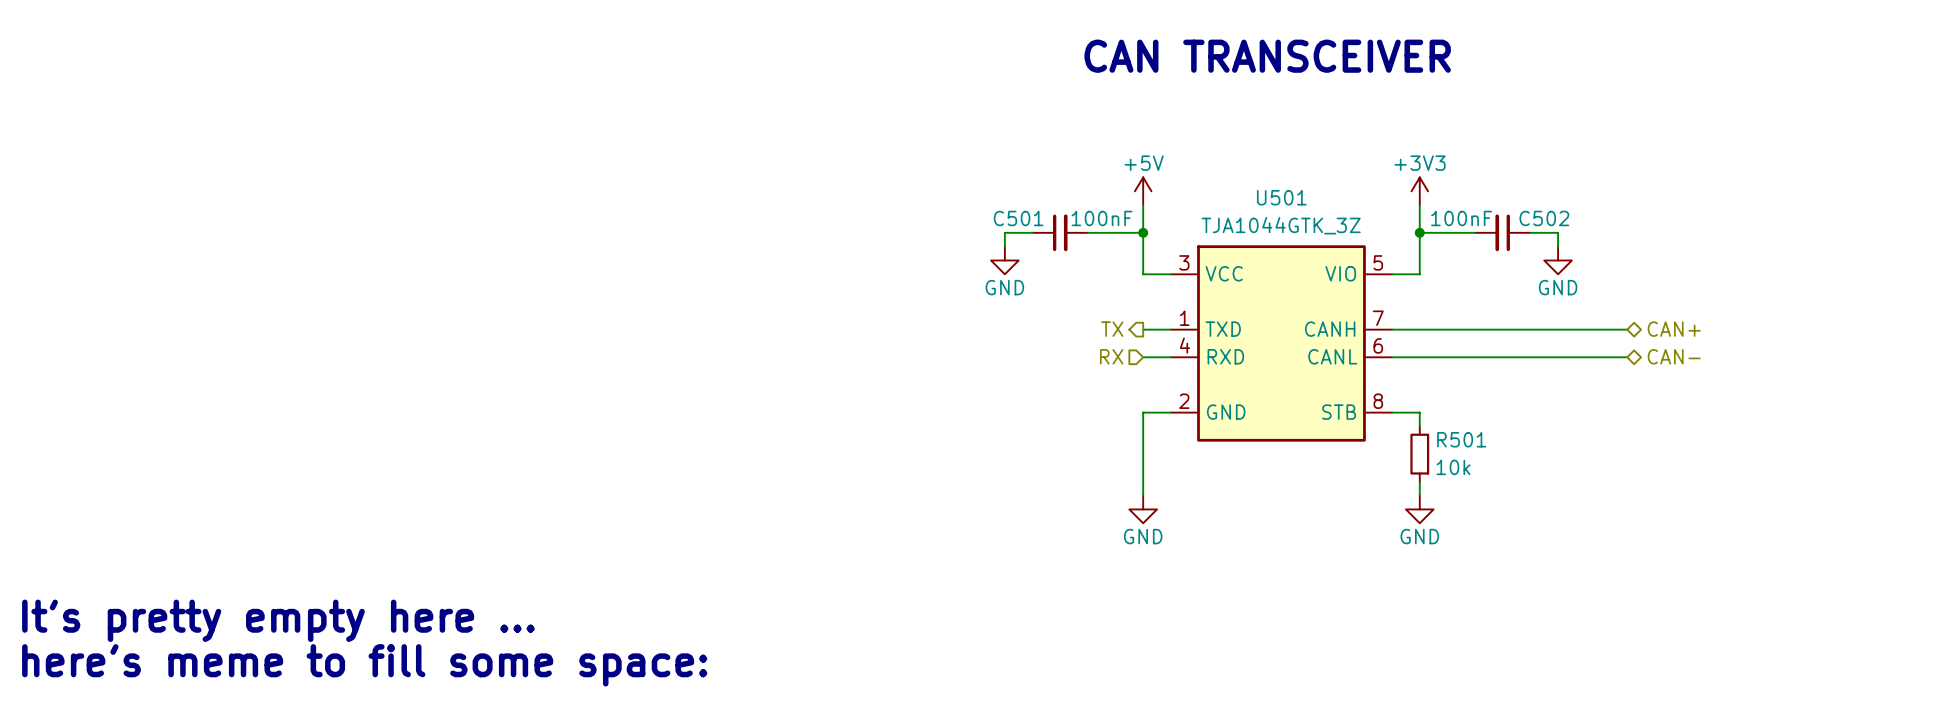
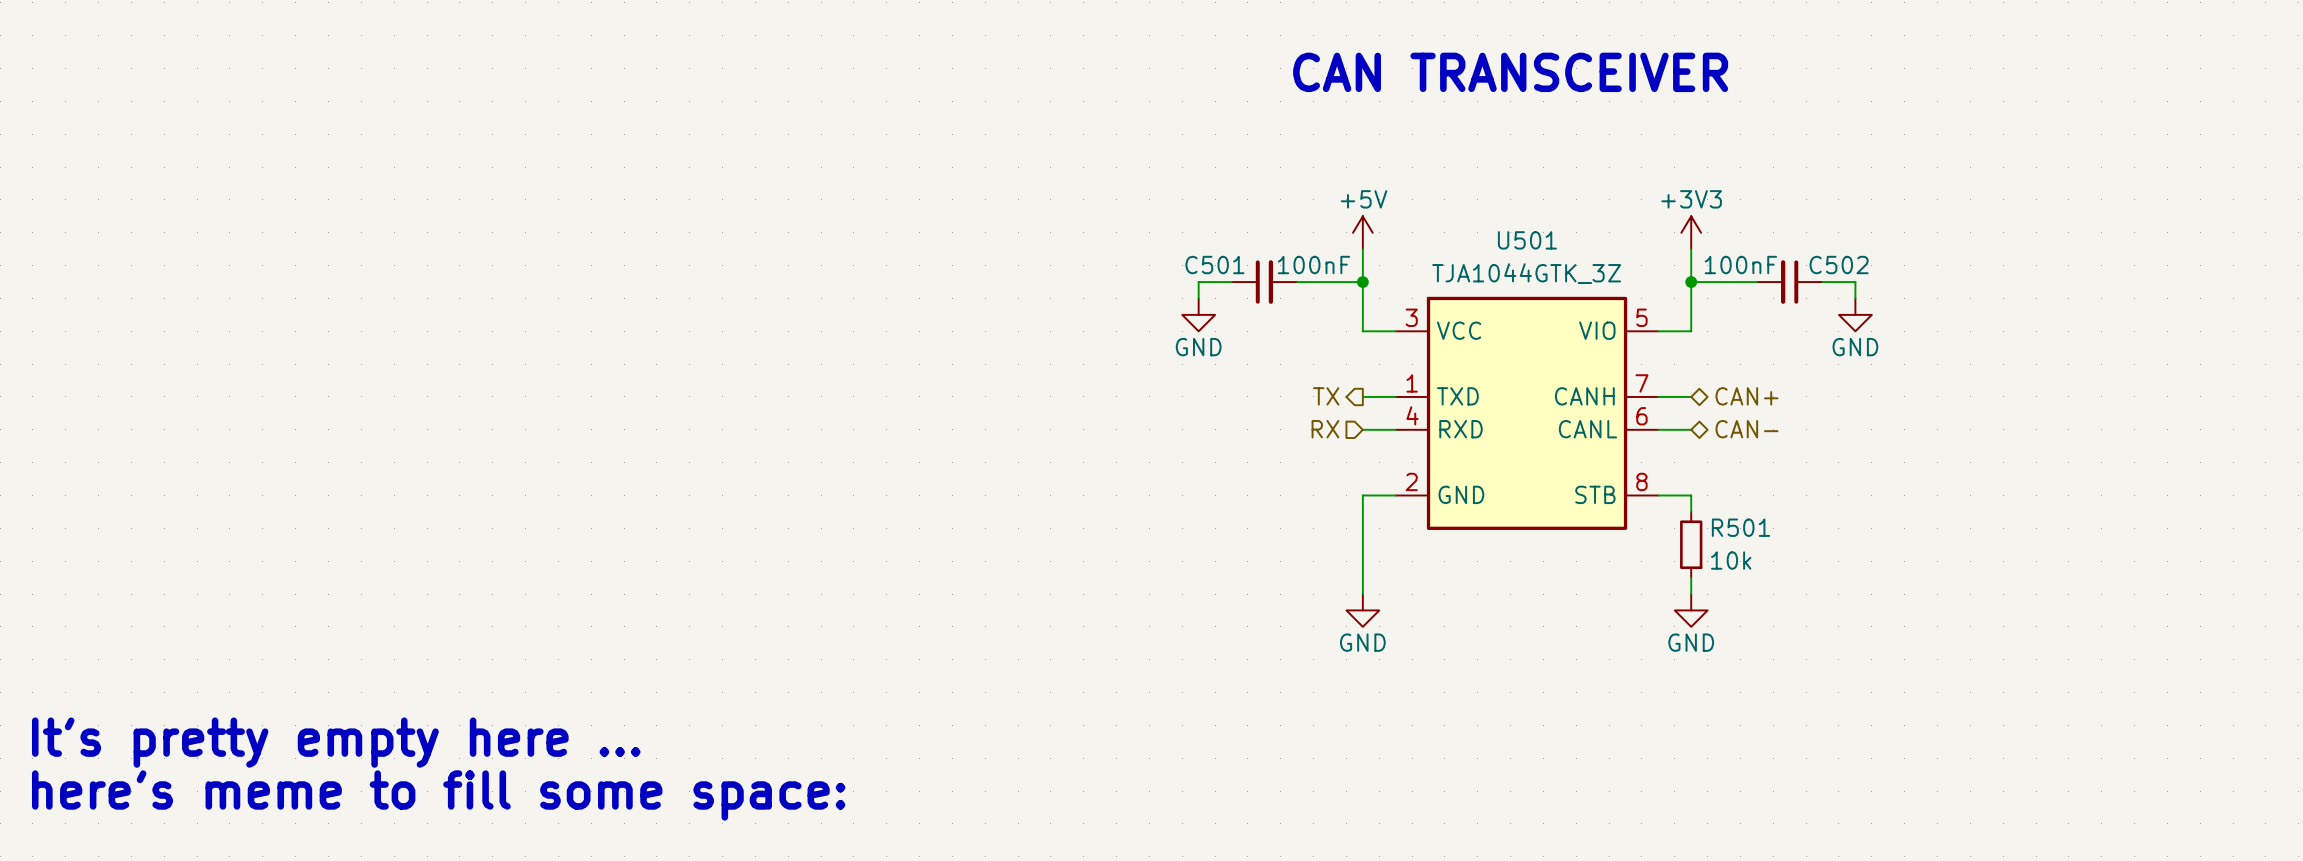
wire: (1419, 329) (1627, 329) -> none
hierarchical label position: CAN+ (1674, 329) -> CAN+ (1746, 396)
hierarchical label position: CAN- (1674, 356) -> CAN- (1746, 429)
wire: (1419, 357) (1627, 357) -> none

